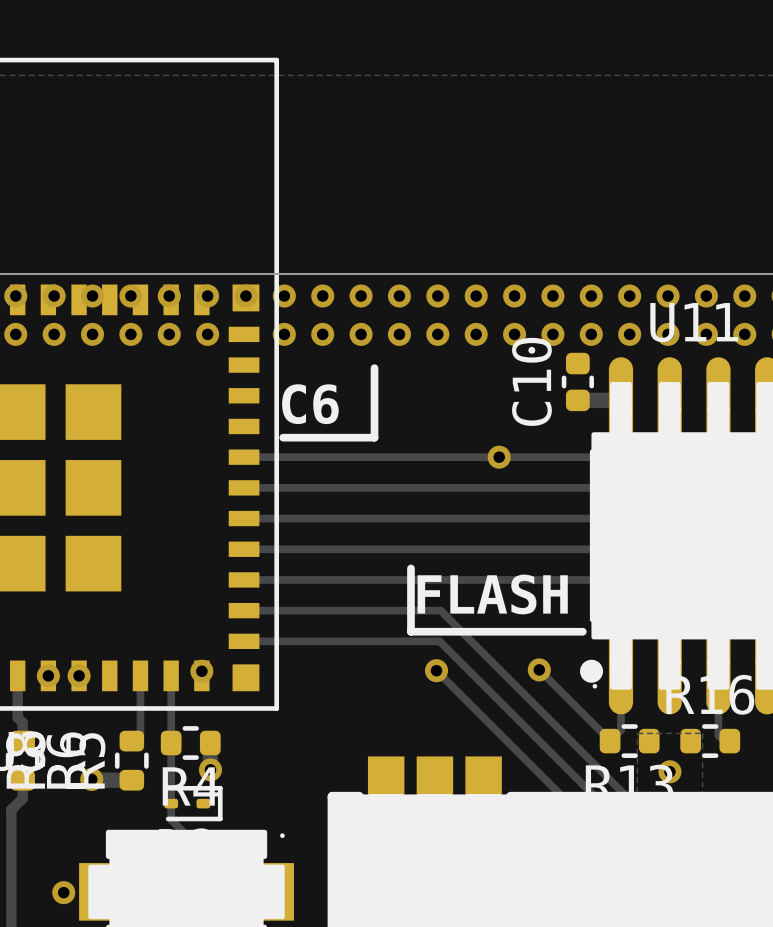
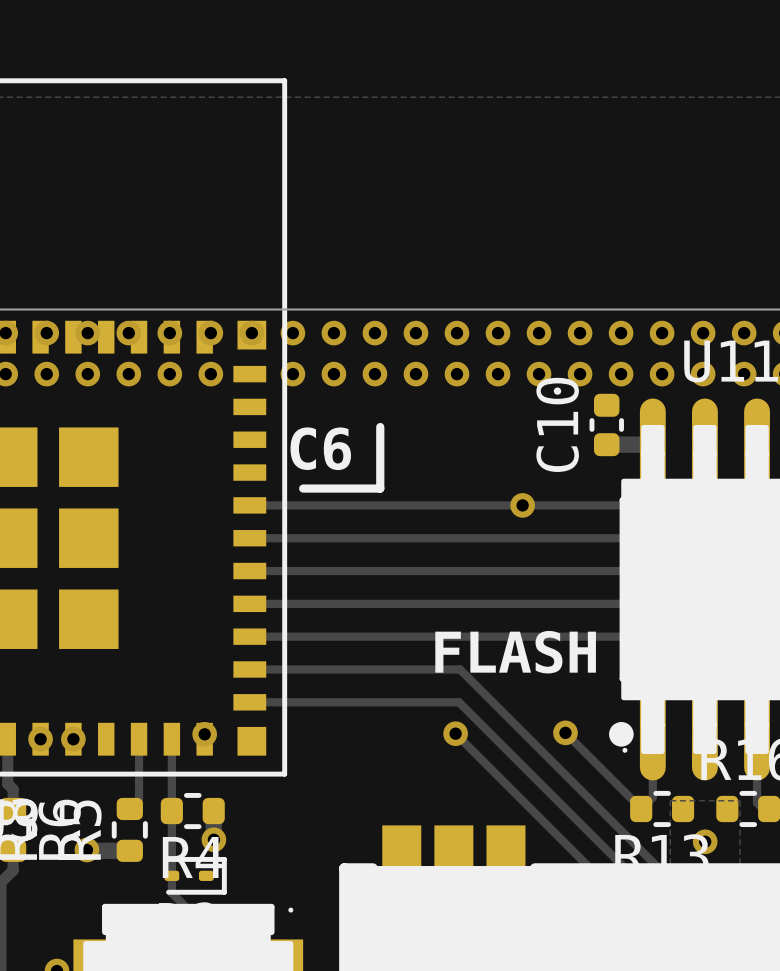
line: (374, 368) (374, 437) (283, 437) -> none
line: none -> (380, 427) (380, 488) (303, 488)
line: (410, 568) (410, 631) (582, 631) -> none

